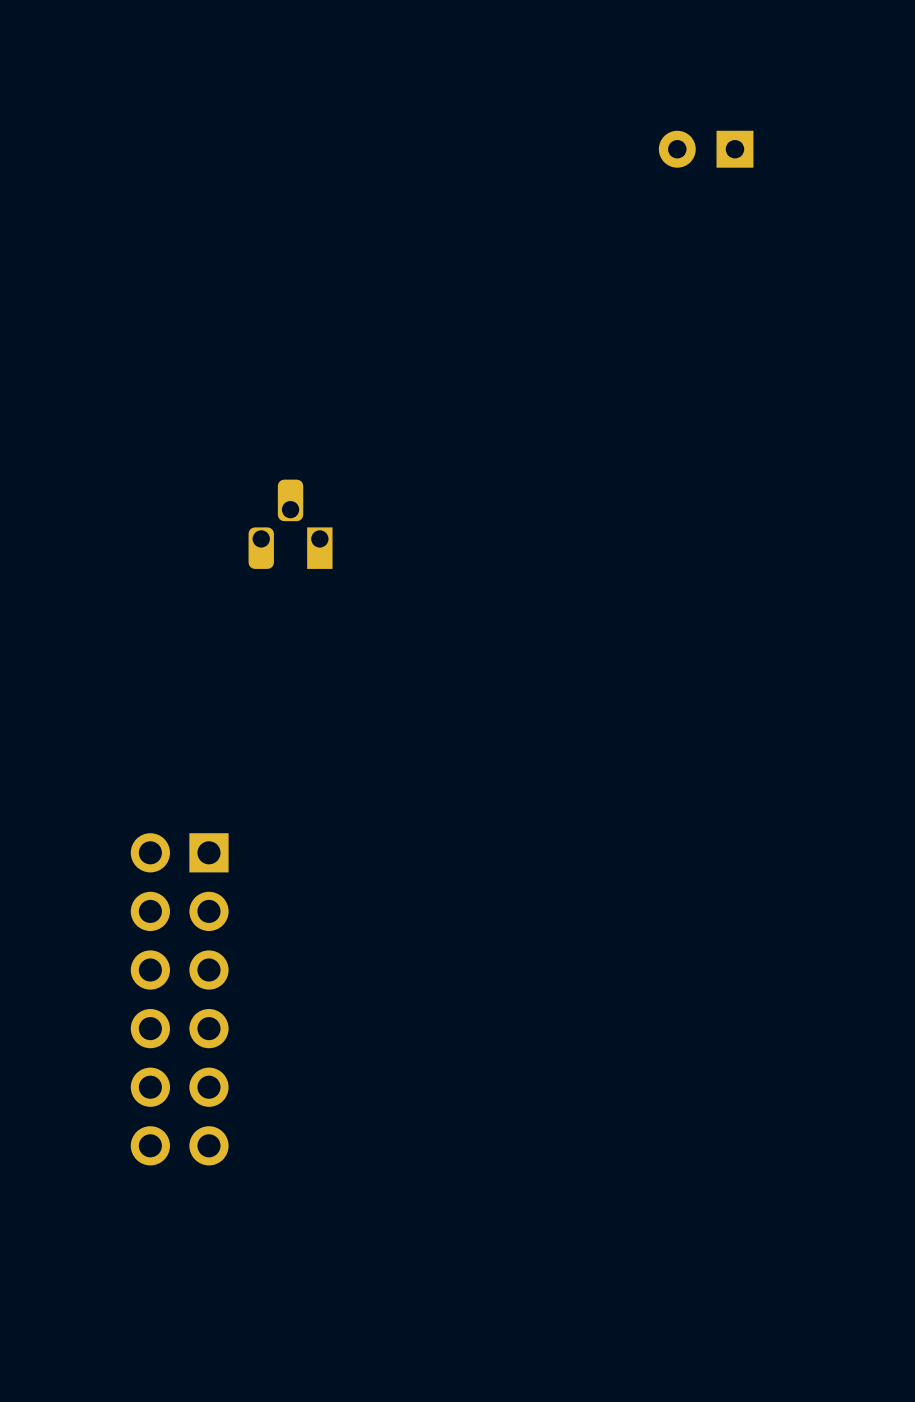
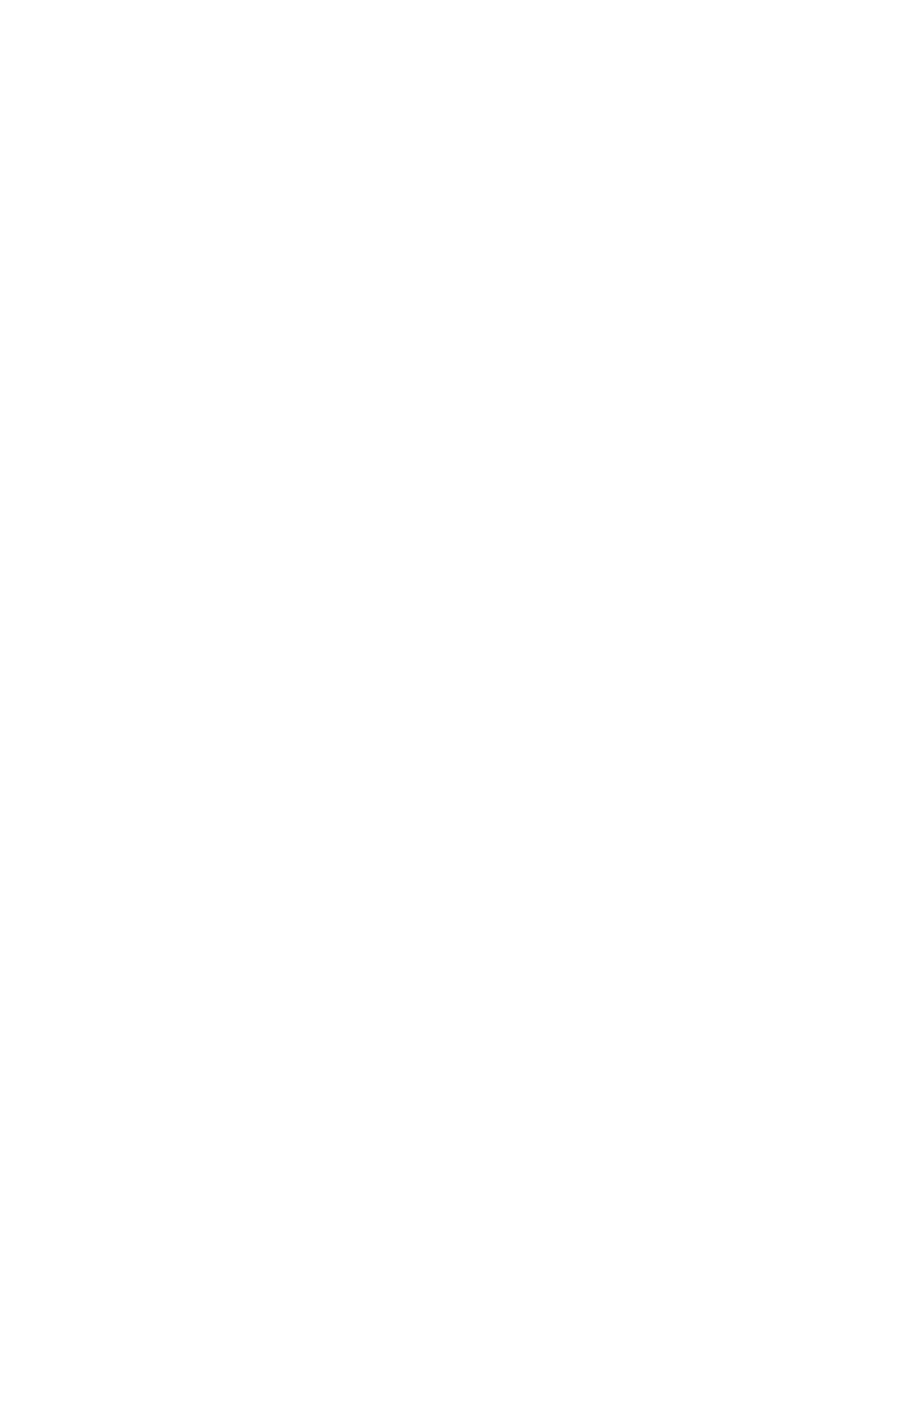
part: (706, 149) -> none
part: (290, 524) -> none
part: (179, 999) -> none

